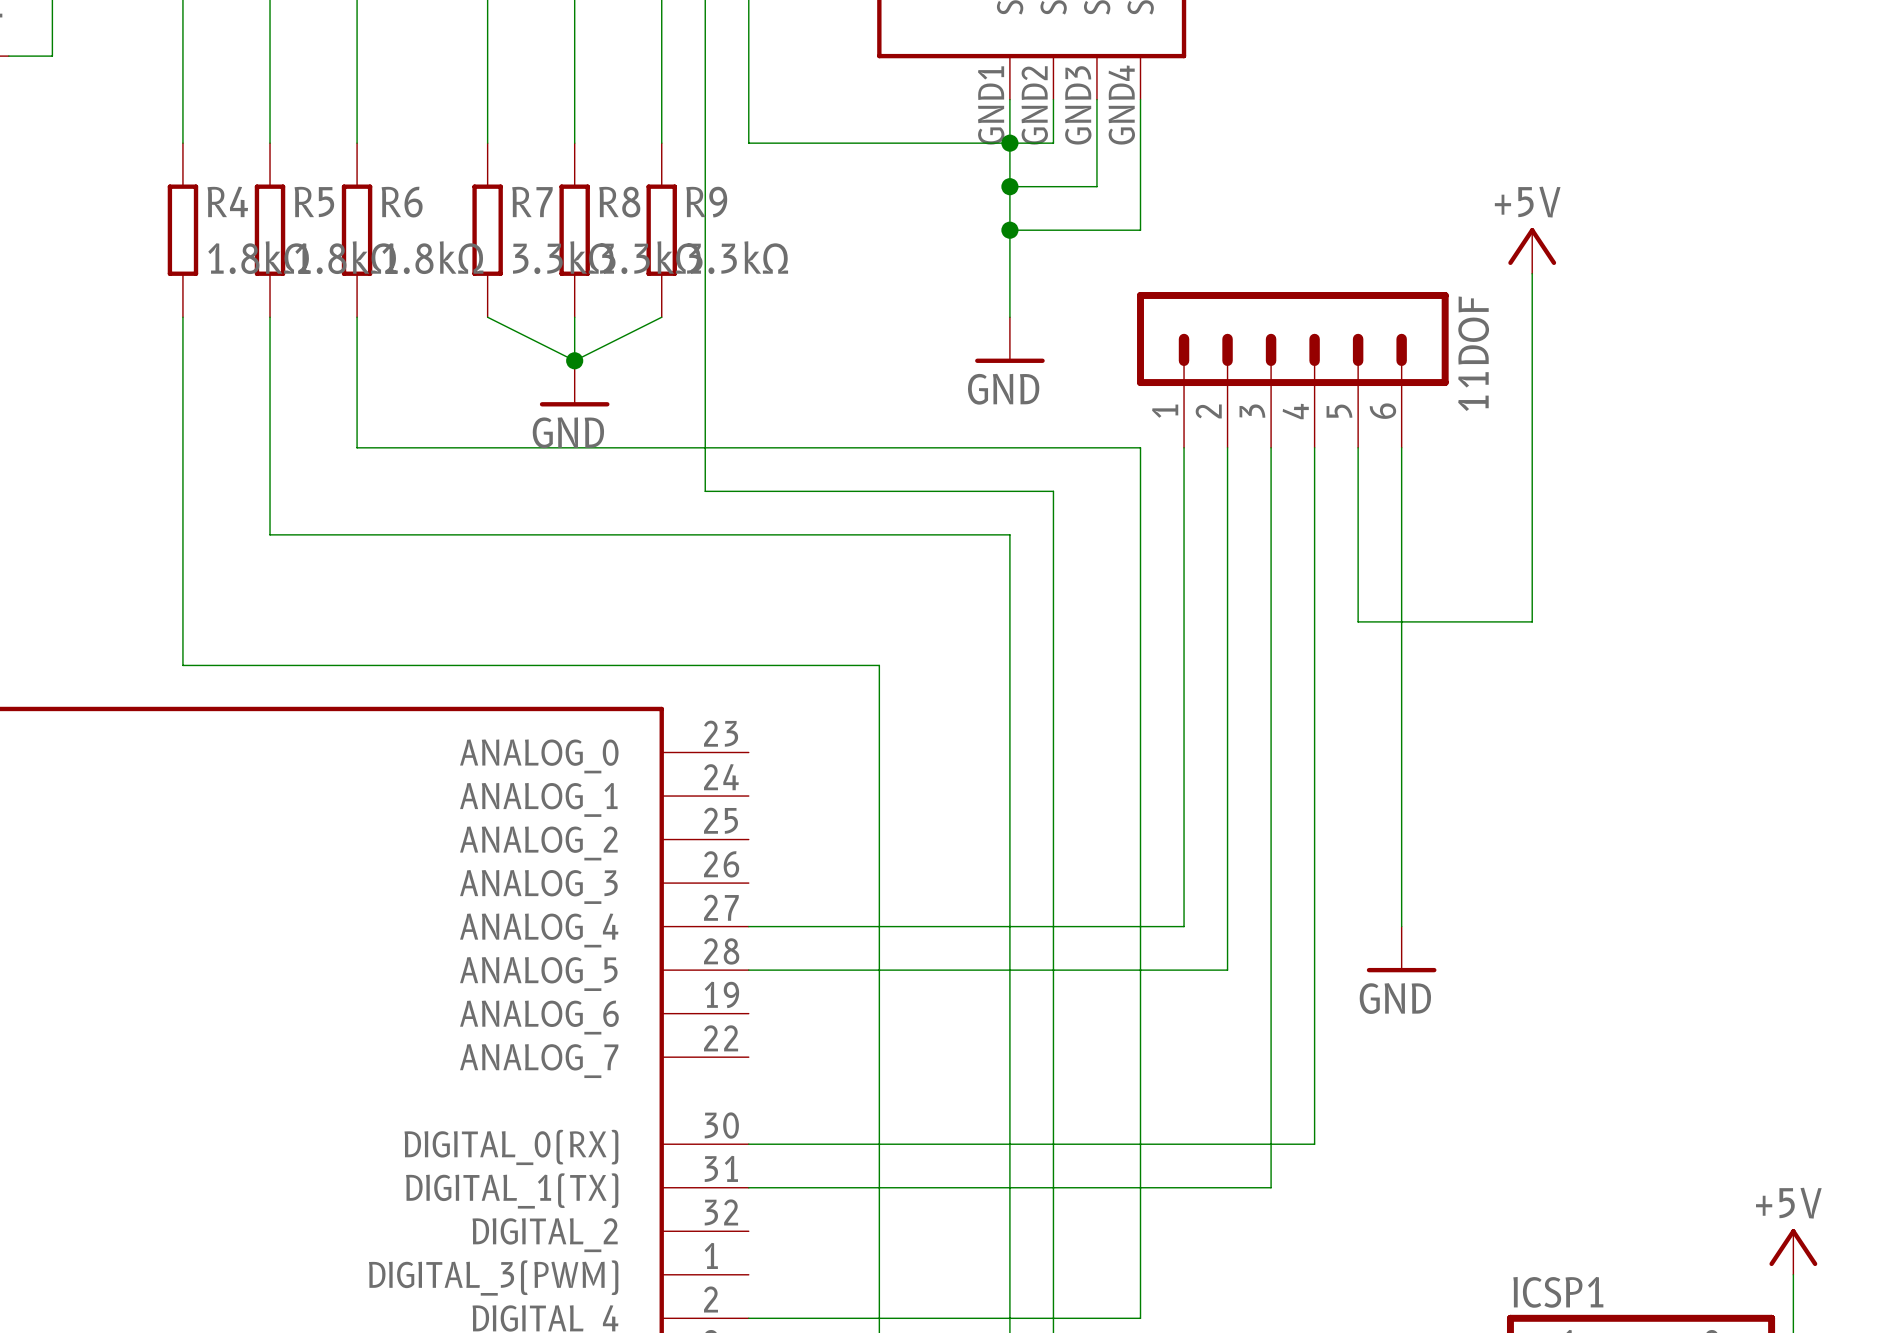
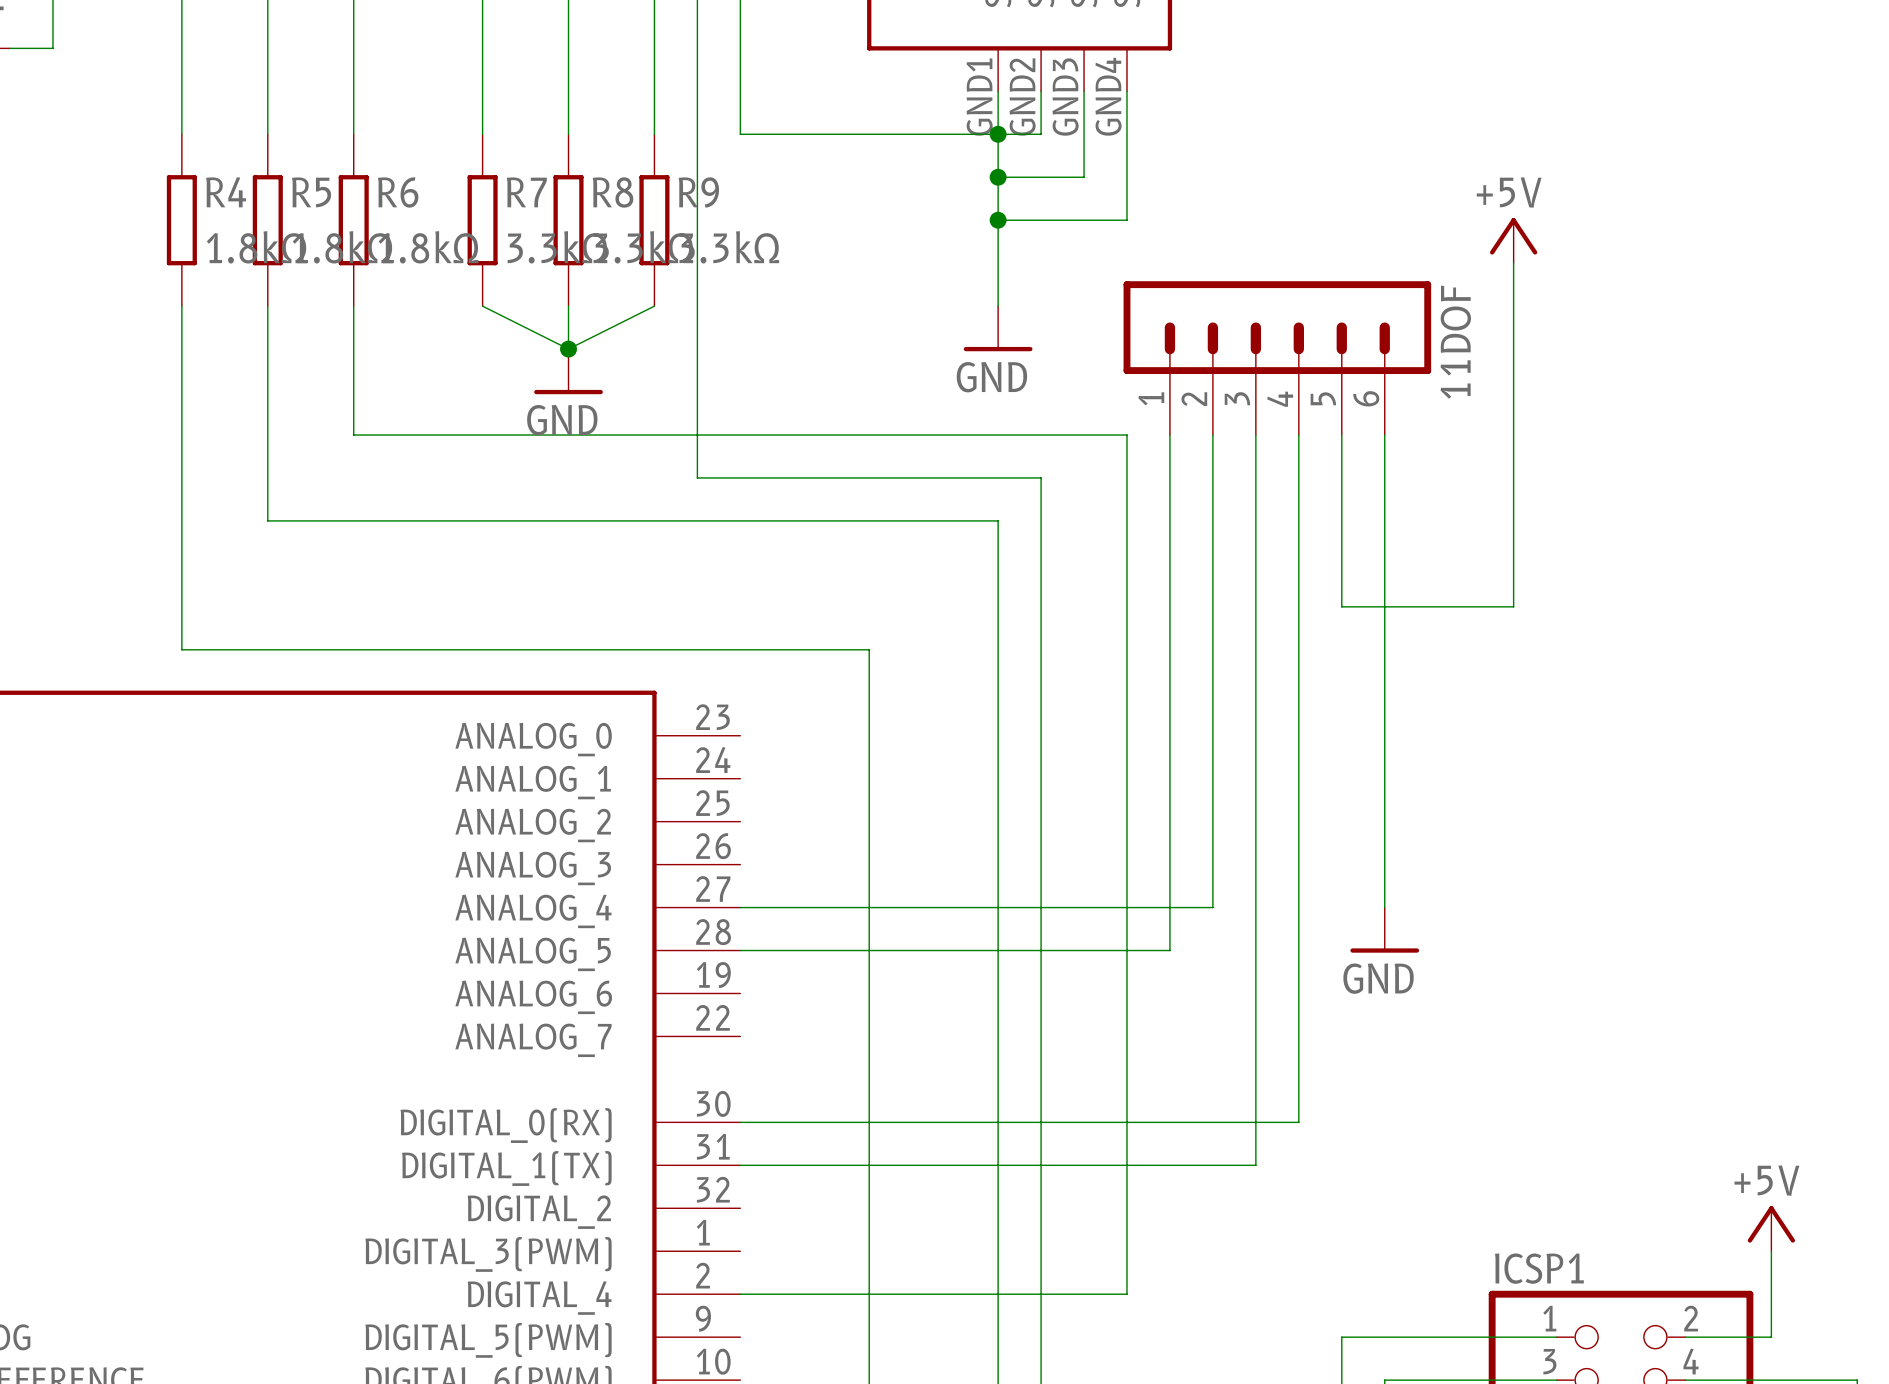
wire: (1227, 926) (1227, 970) (1184, 970) -> (1212, 907) (1169, 907) (1169, 950)

